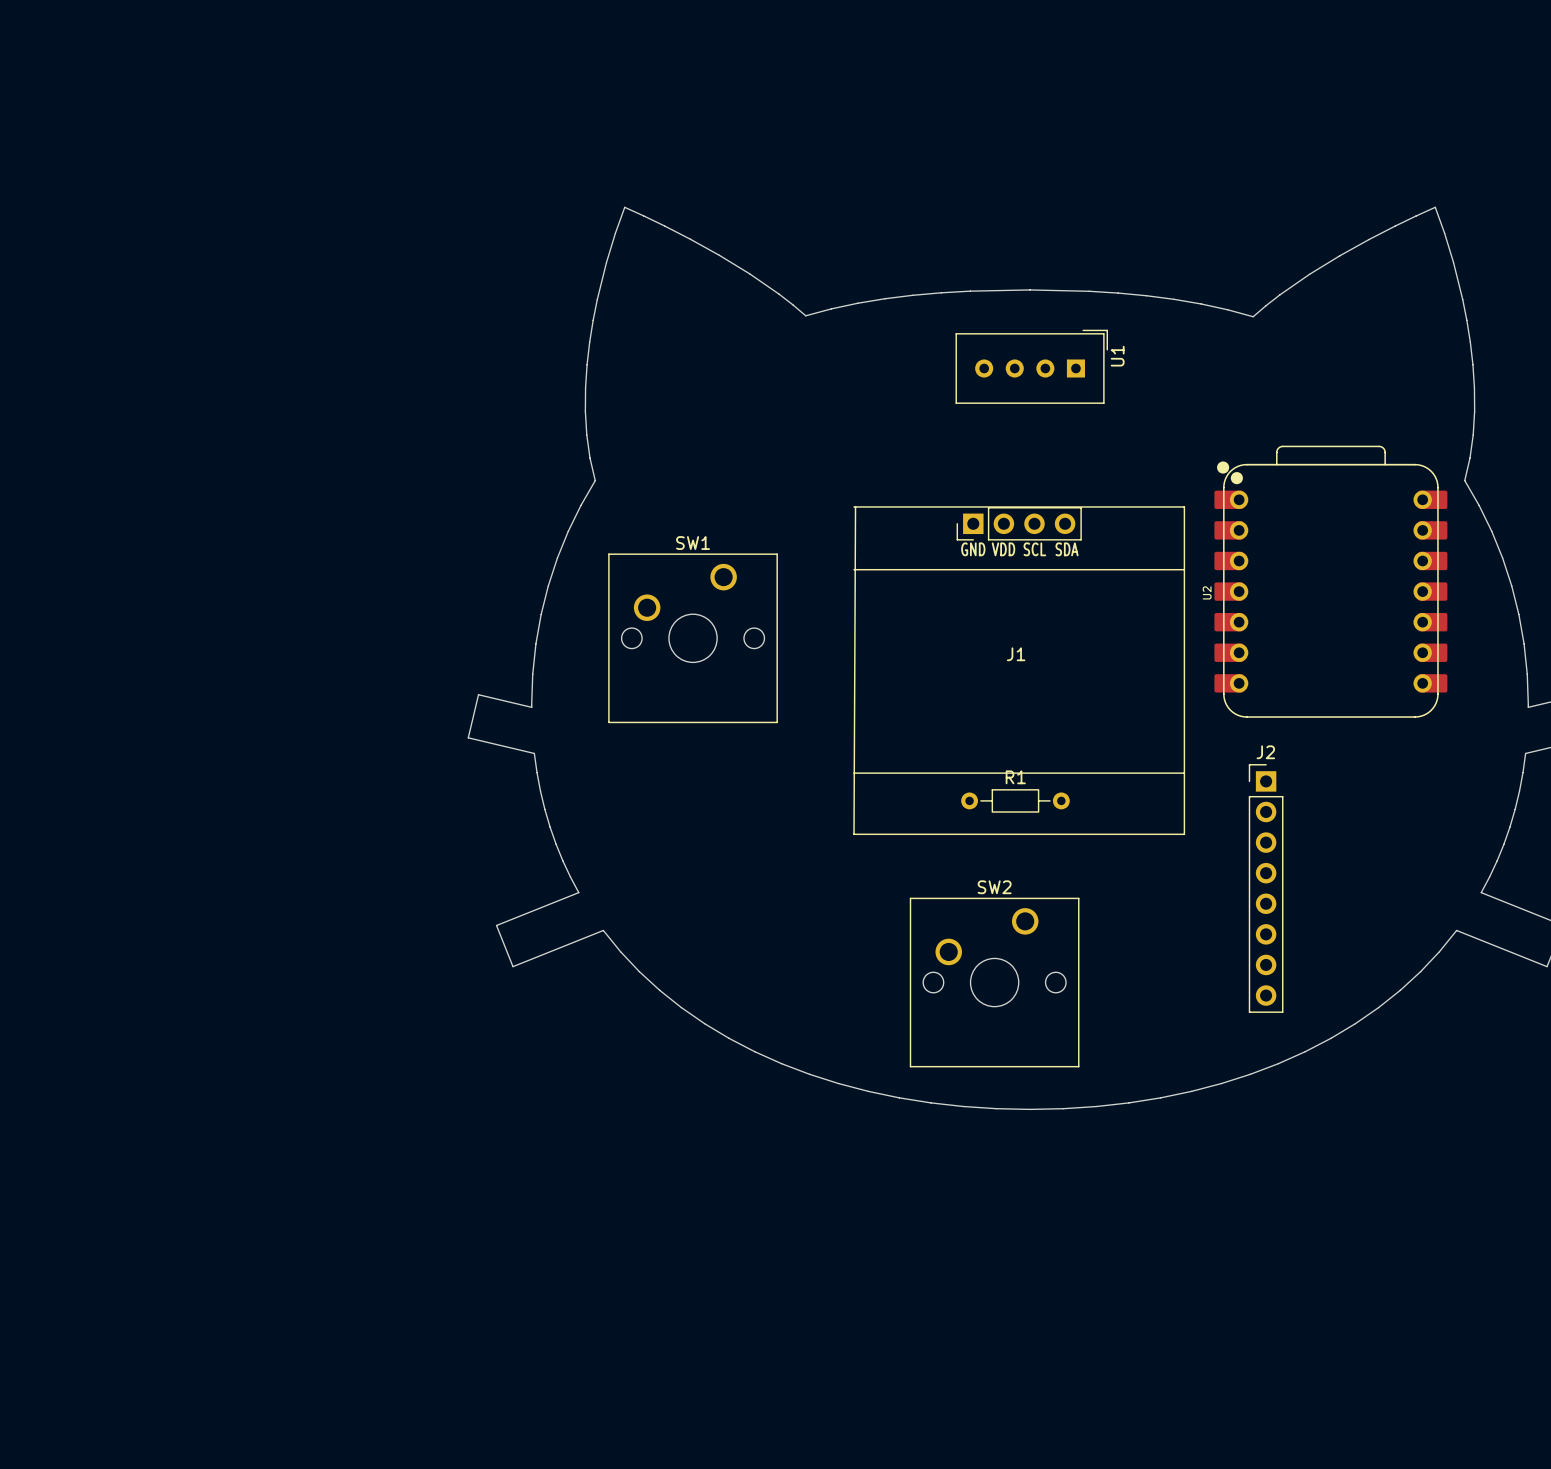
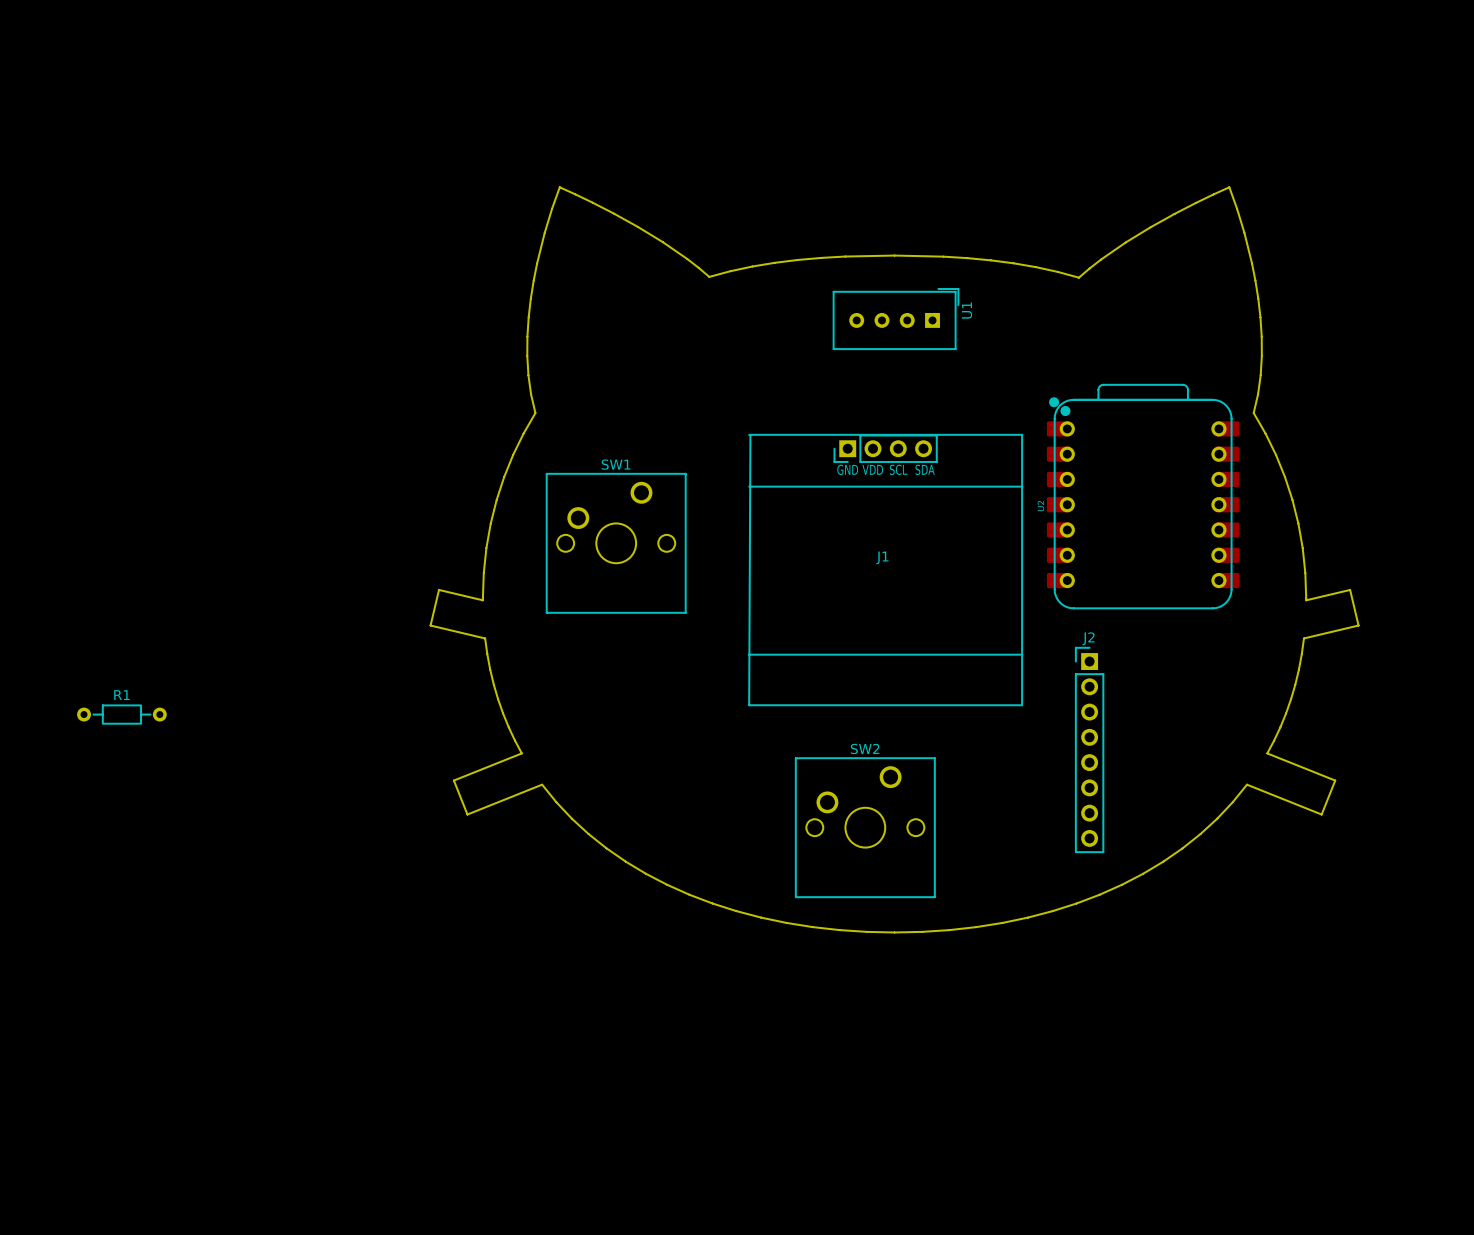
R1 position: (1015, 800) -> (121, 714)

